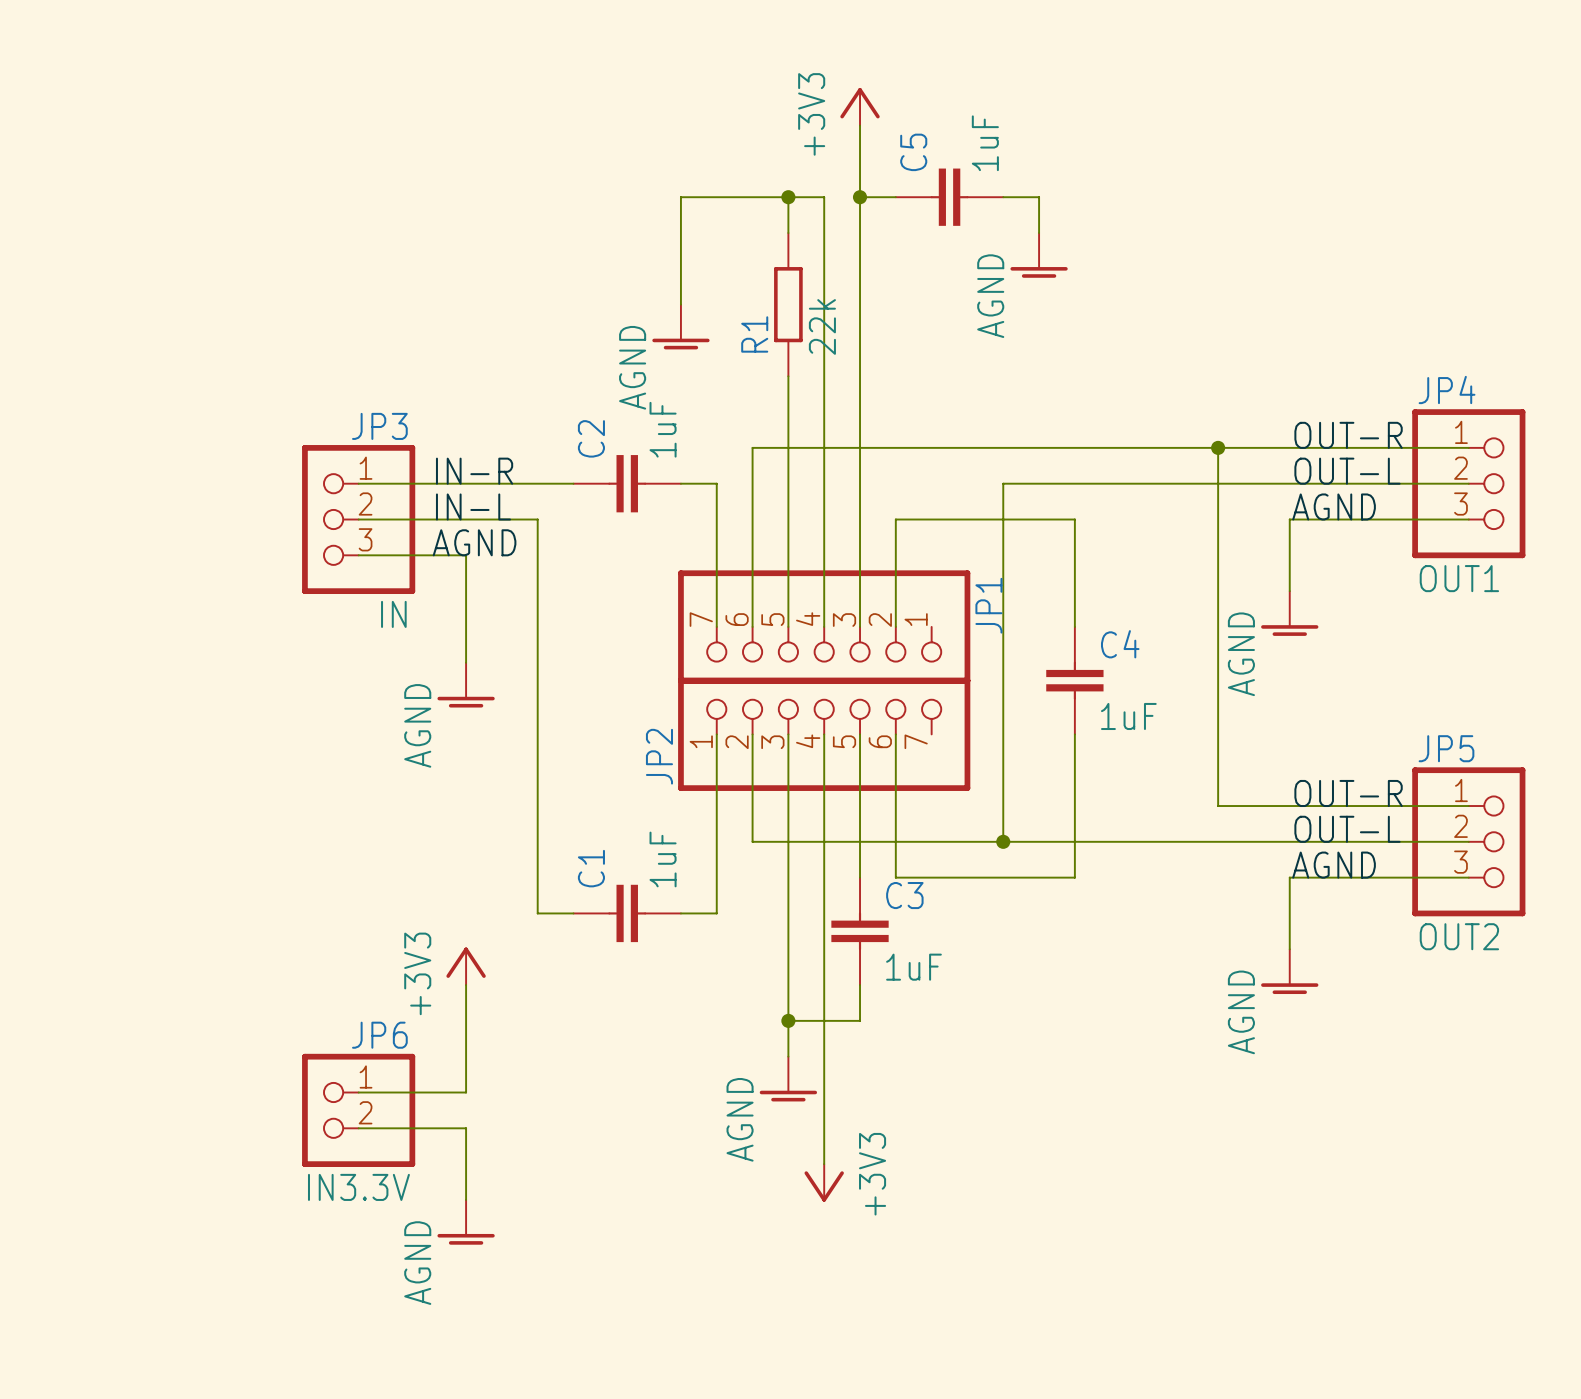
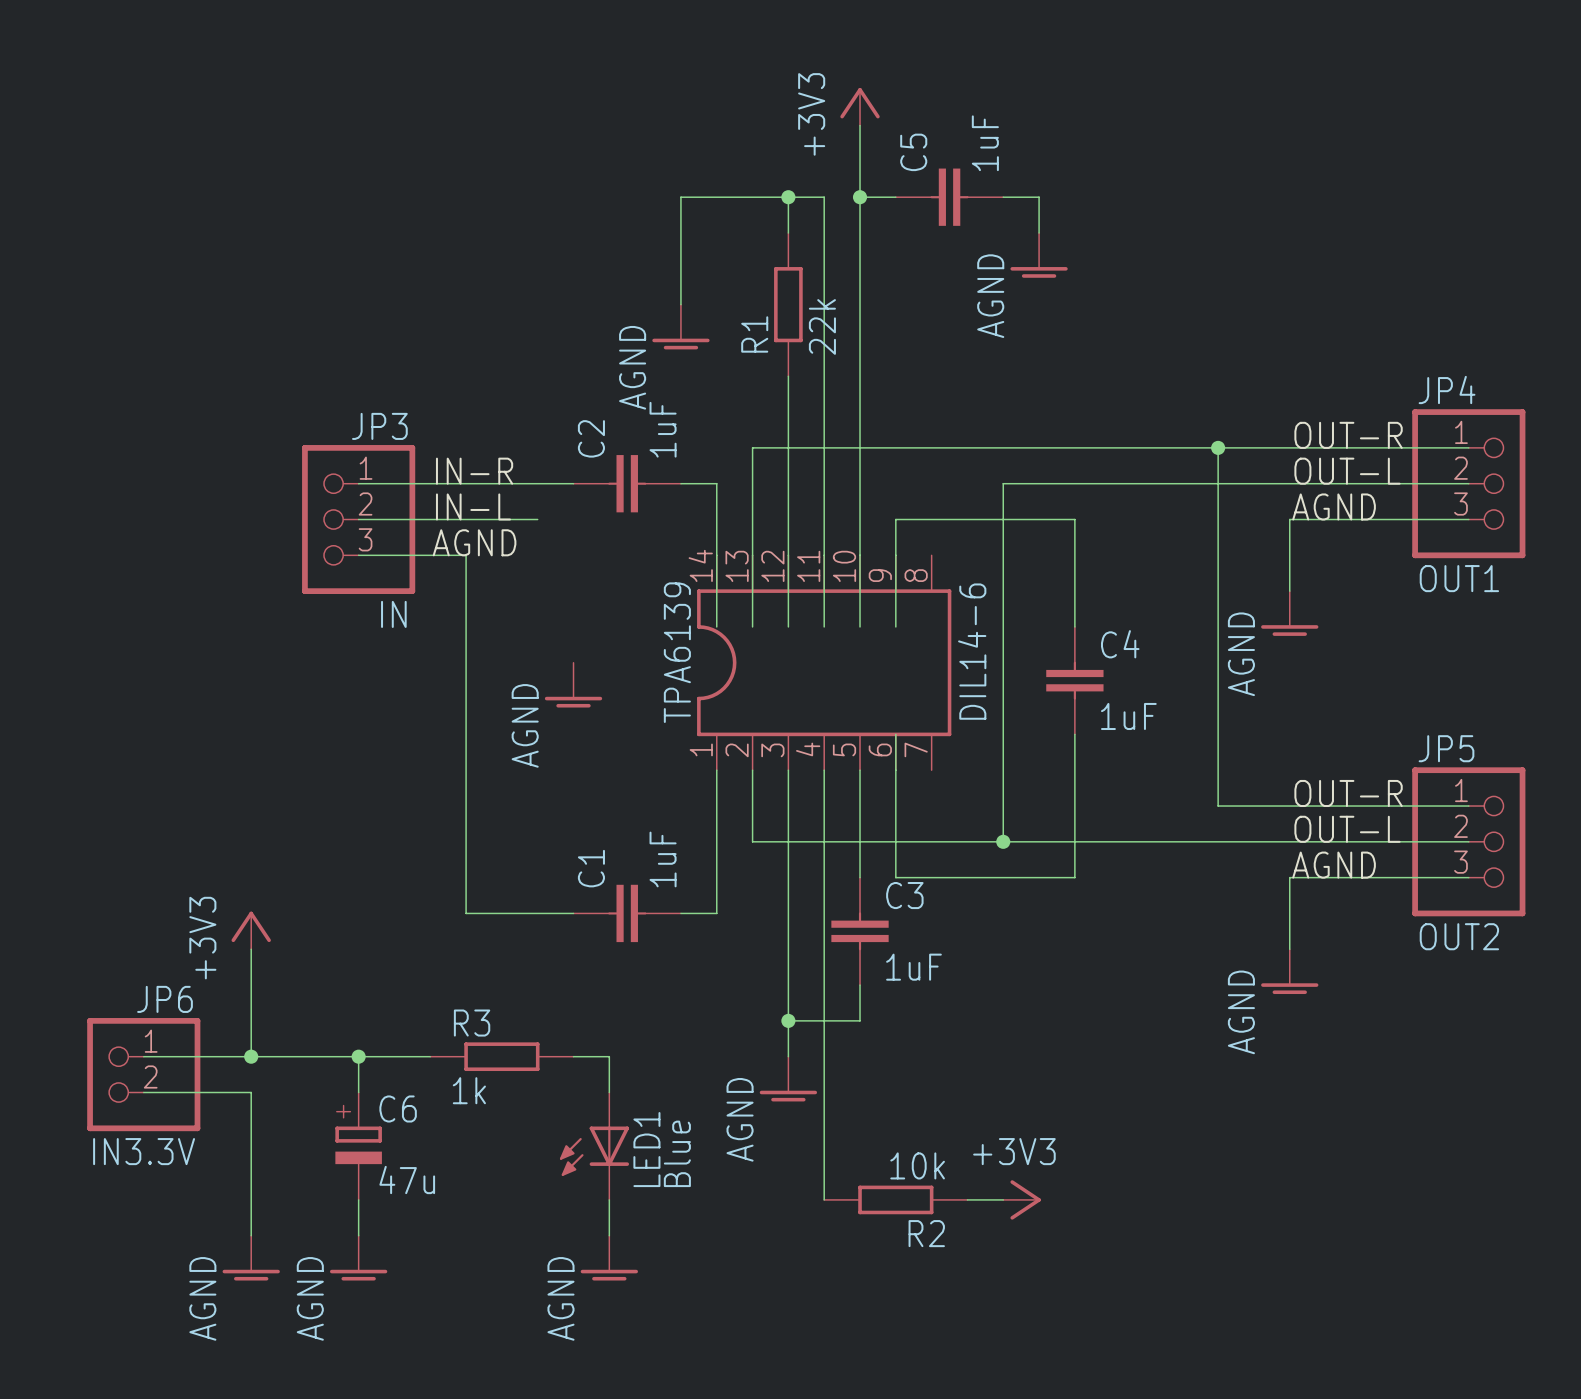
wire: (537, 519) (537, 913) -> (466, 662) (466, 913) (537, 913)
JP1: (824, 626) -> none
TPA6139: none -> DIL14-6 (824, 662)
power symbol position: AGND (466, 685) -> AGND (573, 685)
JP2: (824, 734) -> none
wire: none -> (251, 949) (251, 1056)
power symbol position: +3V3 (466, 966) -> +3V3 (251, 930)
wire: (466, 985) (466, 1092) (358, 1092) -> (358, 1056) (358, 1092)
wire: none -> (143, 1056) (430, 1056)
junction: none -> (251, 1056)
junction: none -> (358, 1056)
R3: none -> 1k (501, 1056)
wire: none -> (573, 1056) (609, 1056) (609, 1092)
wire: none -> (143, 1092) (251, 1092) (251, 1235)
JP6 position: (358, 1110) -> (143, 1074)
wire: (358, 1128) (466, 1128) (466, 1199) -> none
C6: none -> 47u (358, 1146)
LED1: none -> Blue (594, 1146)
power symbol position: +3V3 (824, 1182) -> +3V3 (1022, 1199)
power symbol rotation: 0° (824, 1186) -> 90° counterclockwise (1025, 1199)
wire: none -> (358, 1199) (358, 1235)
wire: none -> (609, 1199) (609, 1235)
R2: none -> 10k (895, 1199)
wire: none -> (967, 1199) (1003, 1199)
power symbol: AGND (466, 1222) -> none
power symbol: none -> AGND (251, 1258)
power symbol: none -> AGND (358, 1258)
power symbol: none -> AGND (609, 1258)

